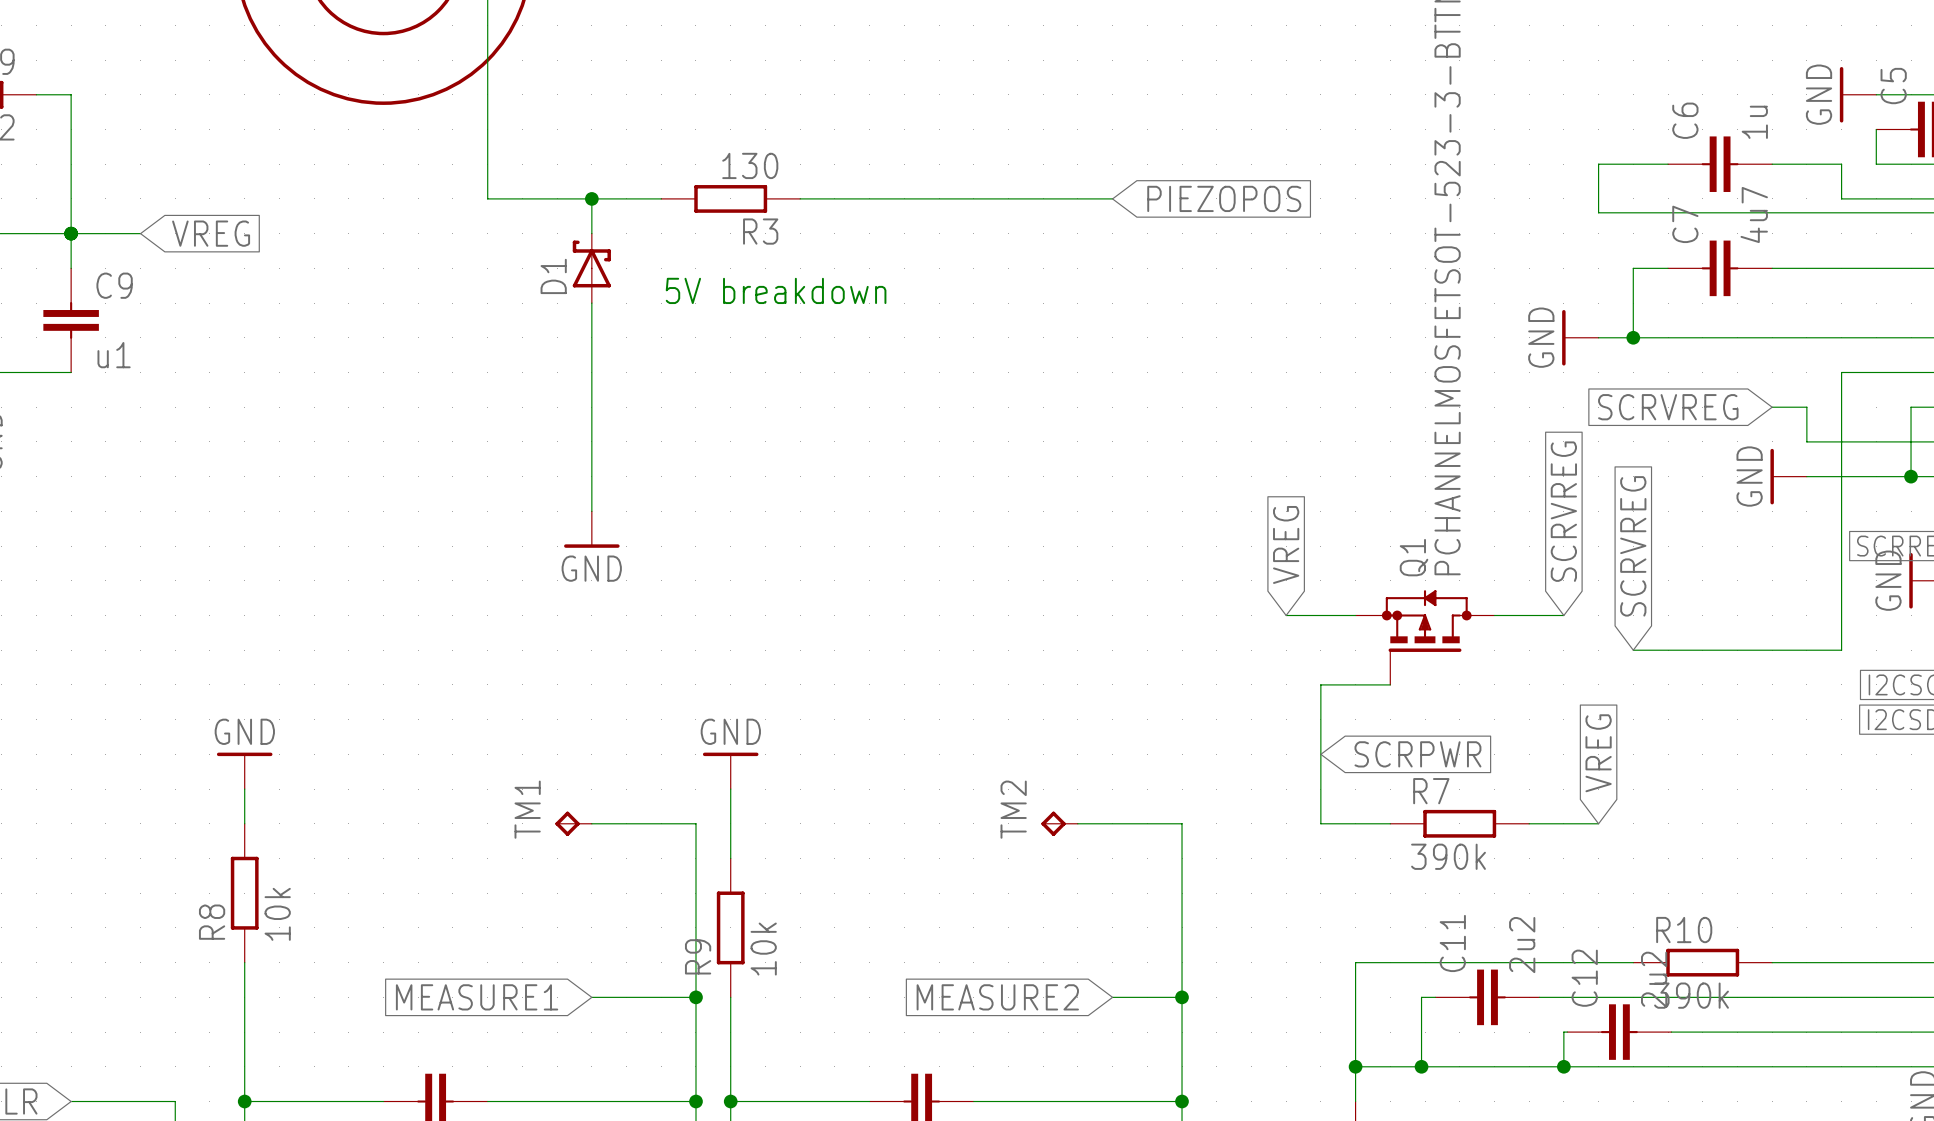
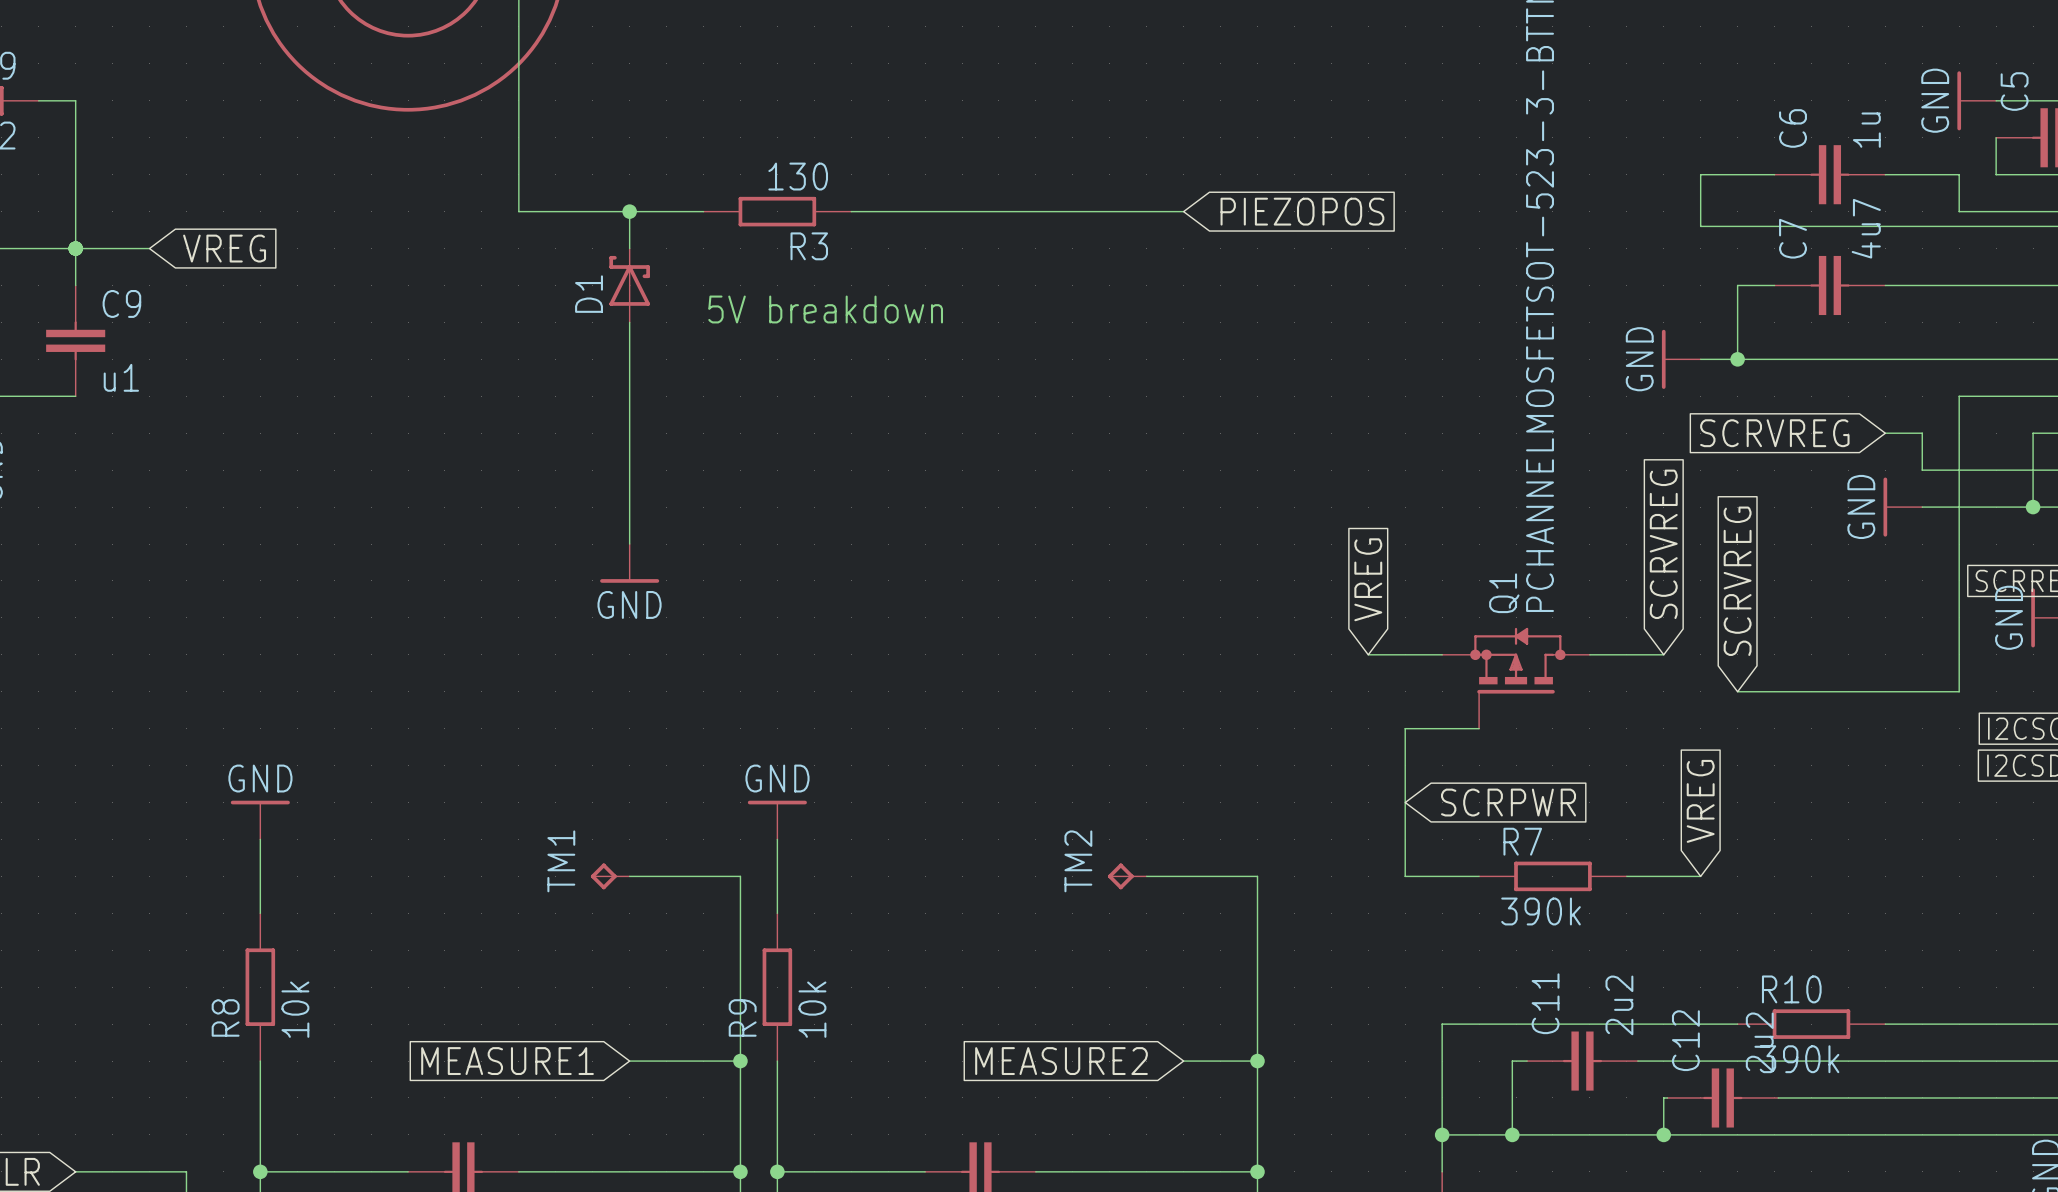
R8 position: (244, 893) -> (260, 987)

